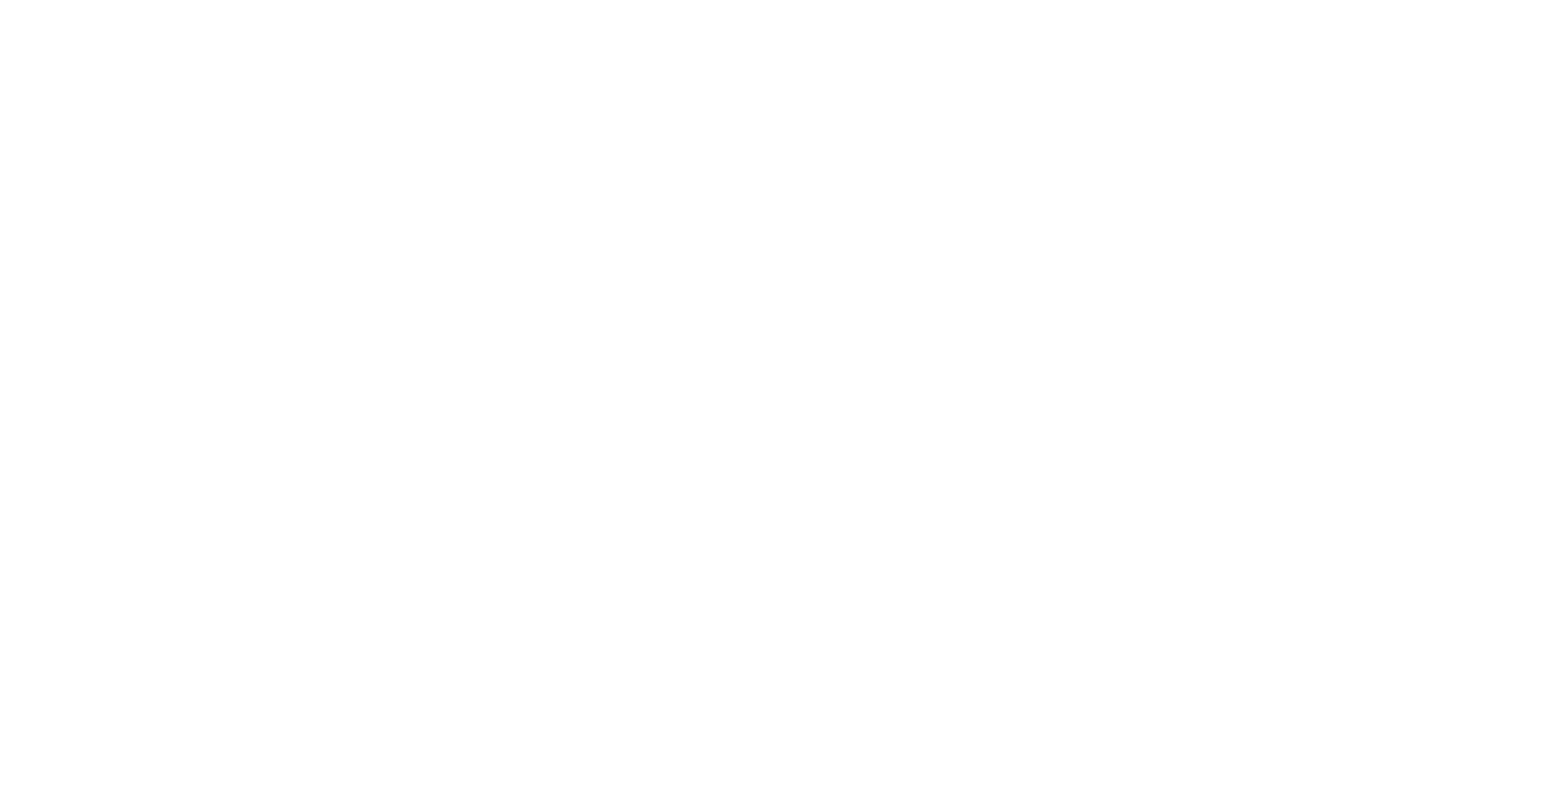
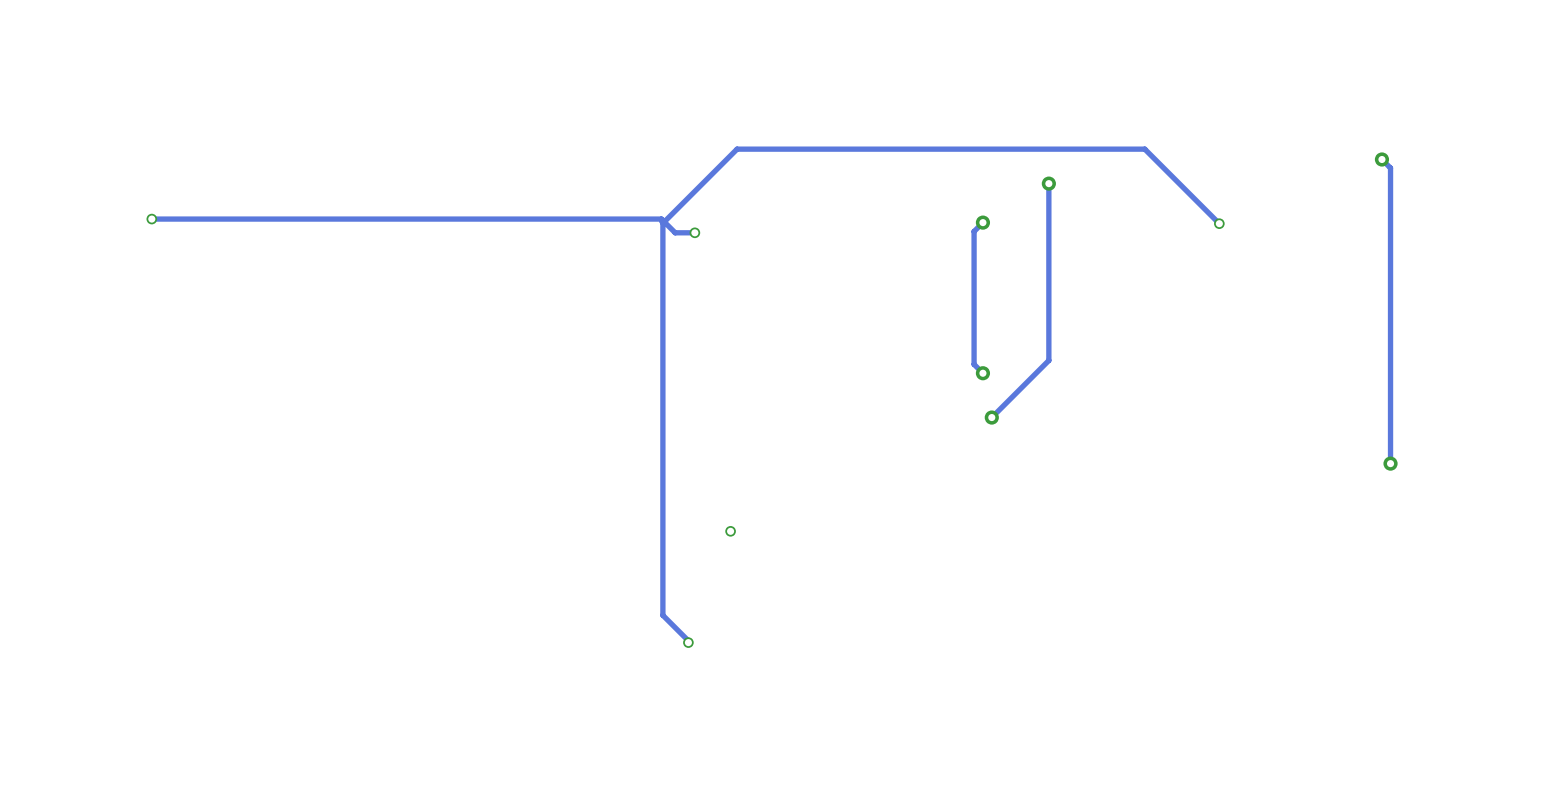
track: none -> (1381, 159) (1390, 168) (1390, 463)
via: none -> (1381, 159)
track: none -> (1048, 183) (1048, 360) (991, 417)
via: none -> (1048, 183)
track: none -> (151, 219) (661, 219) (675, 232) (694, 232)
via: none -> (151, 219)
track: none -> (982, 222) (974, 231) (974, 364) (982, 373)
via: none -> (982, 222)
track: none -> (1219, 223) (1144, 149) (737, 149) (662, 221) (662, 615) (688, 642)
via: none -> (1219, 223)
via: none -> (694, 232)
via: none -> (982, 373)
via: none -> (991, 417)
via: none -> (1390, 463)
via: none -> (730, 531)
via: none -> (688, 642)

